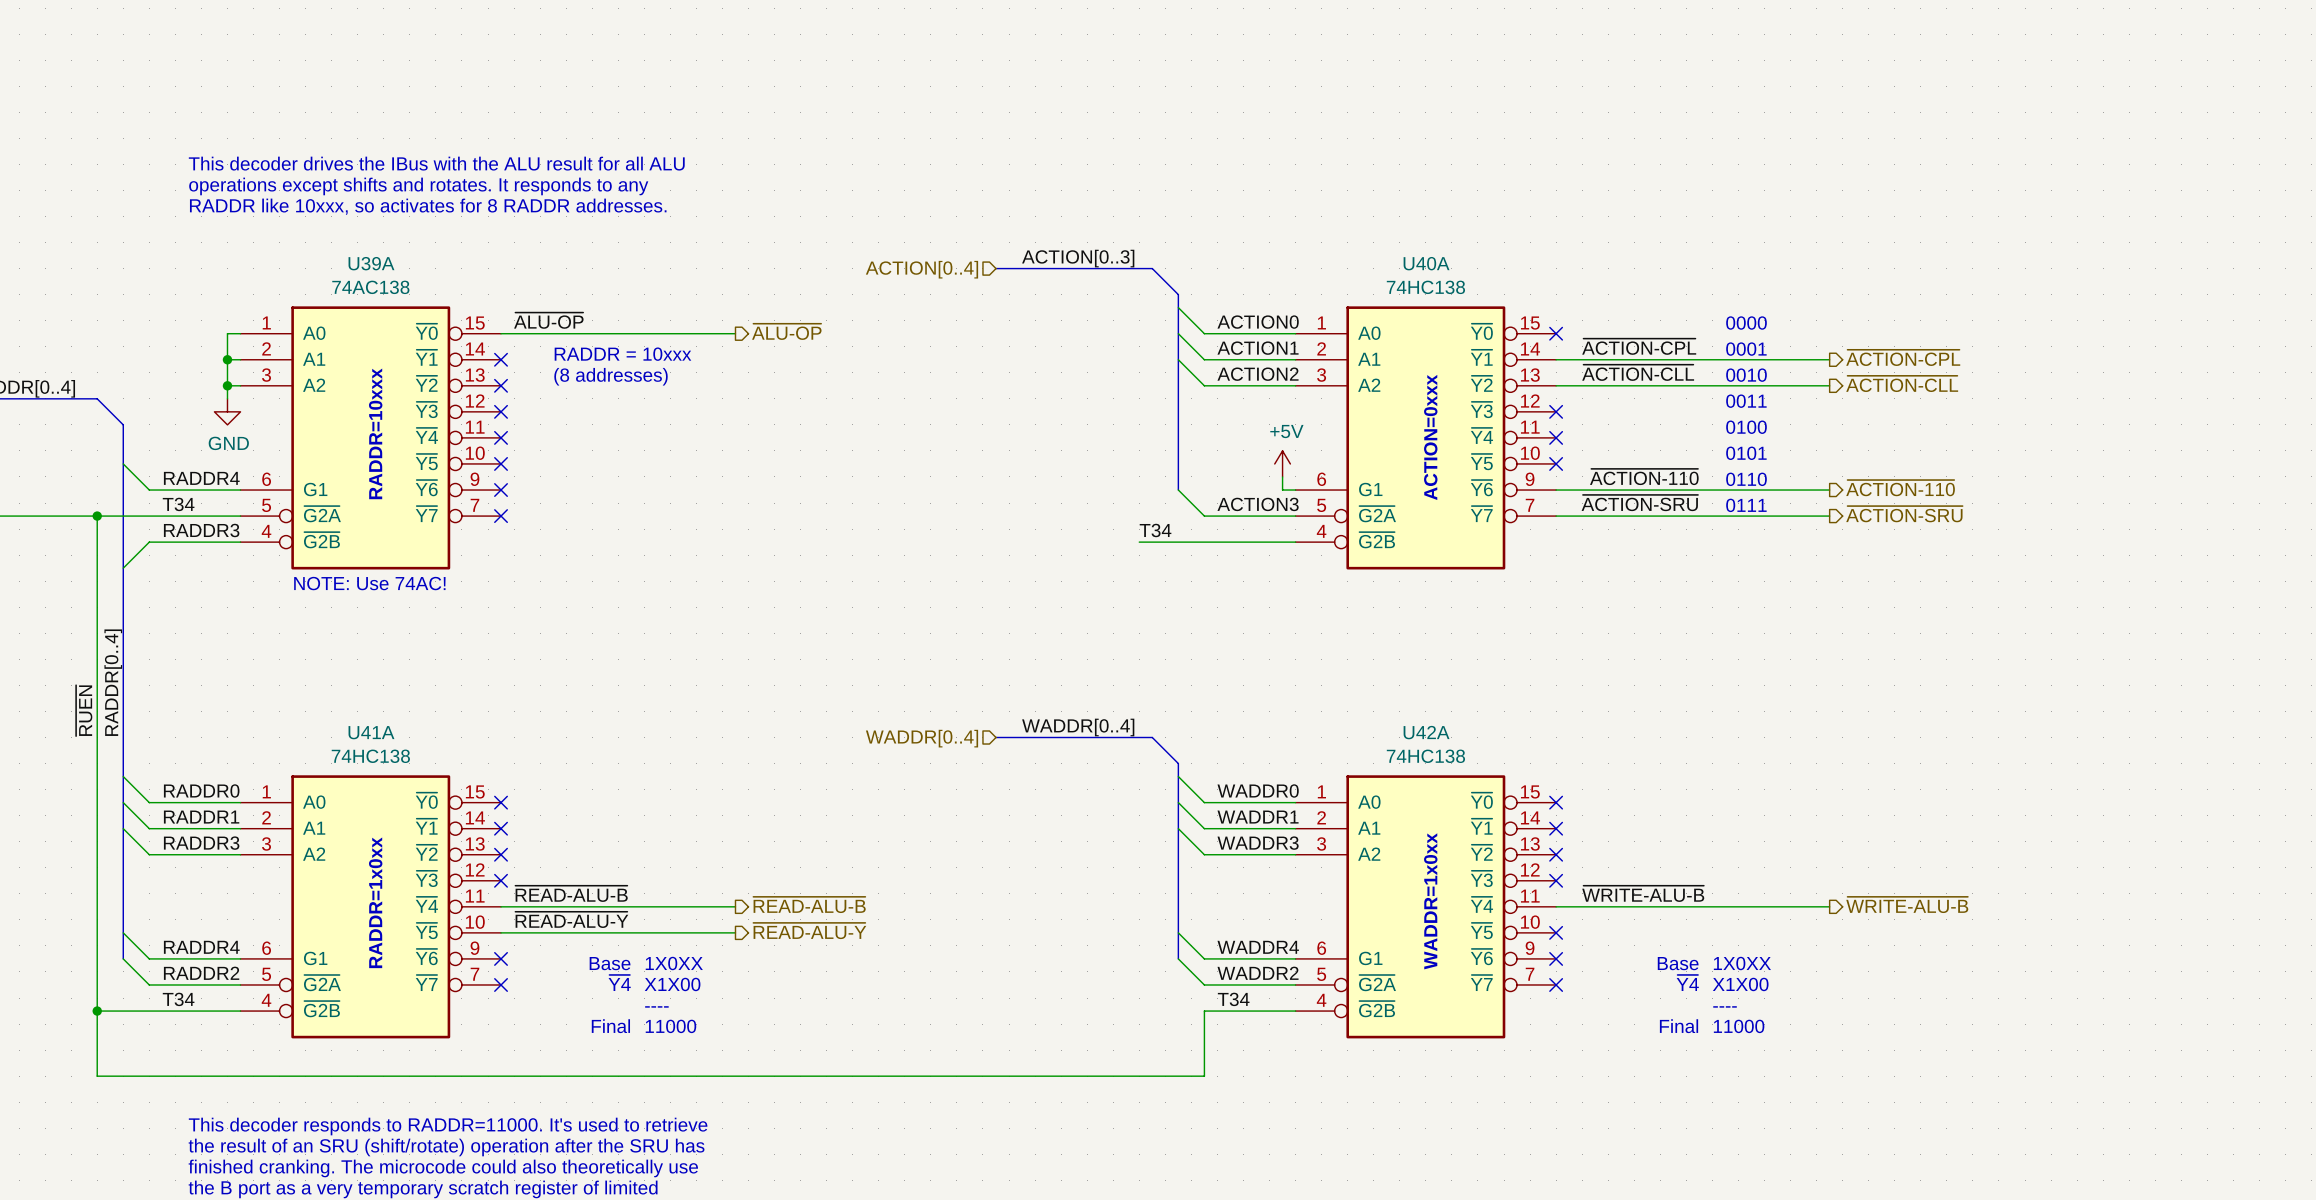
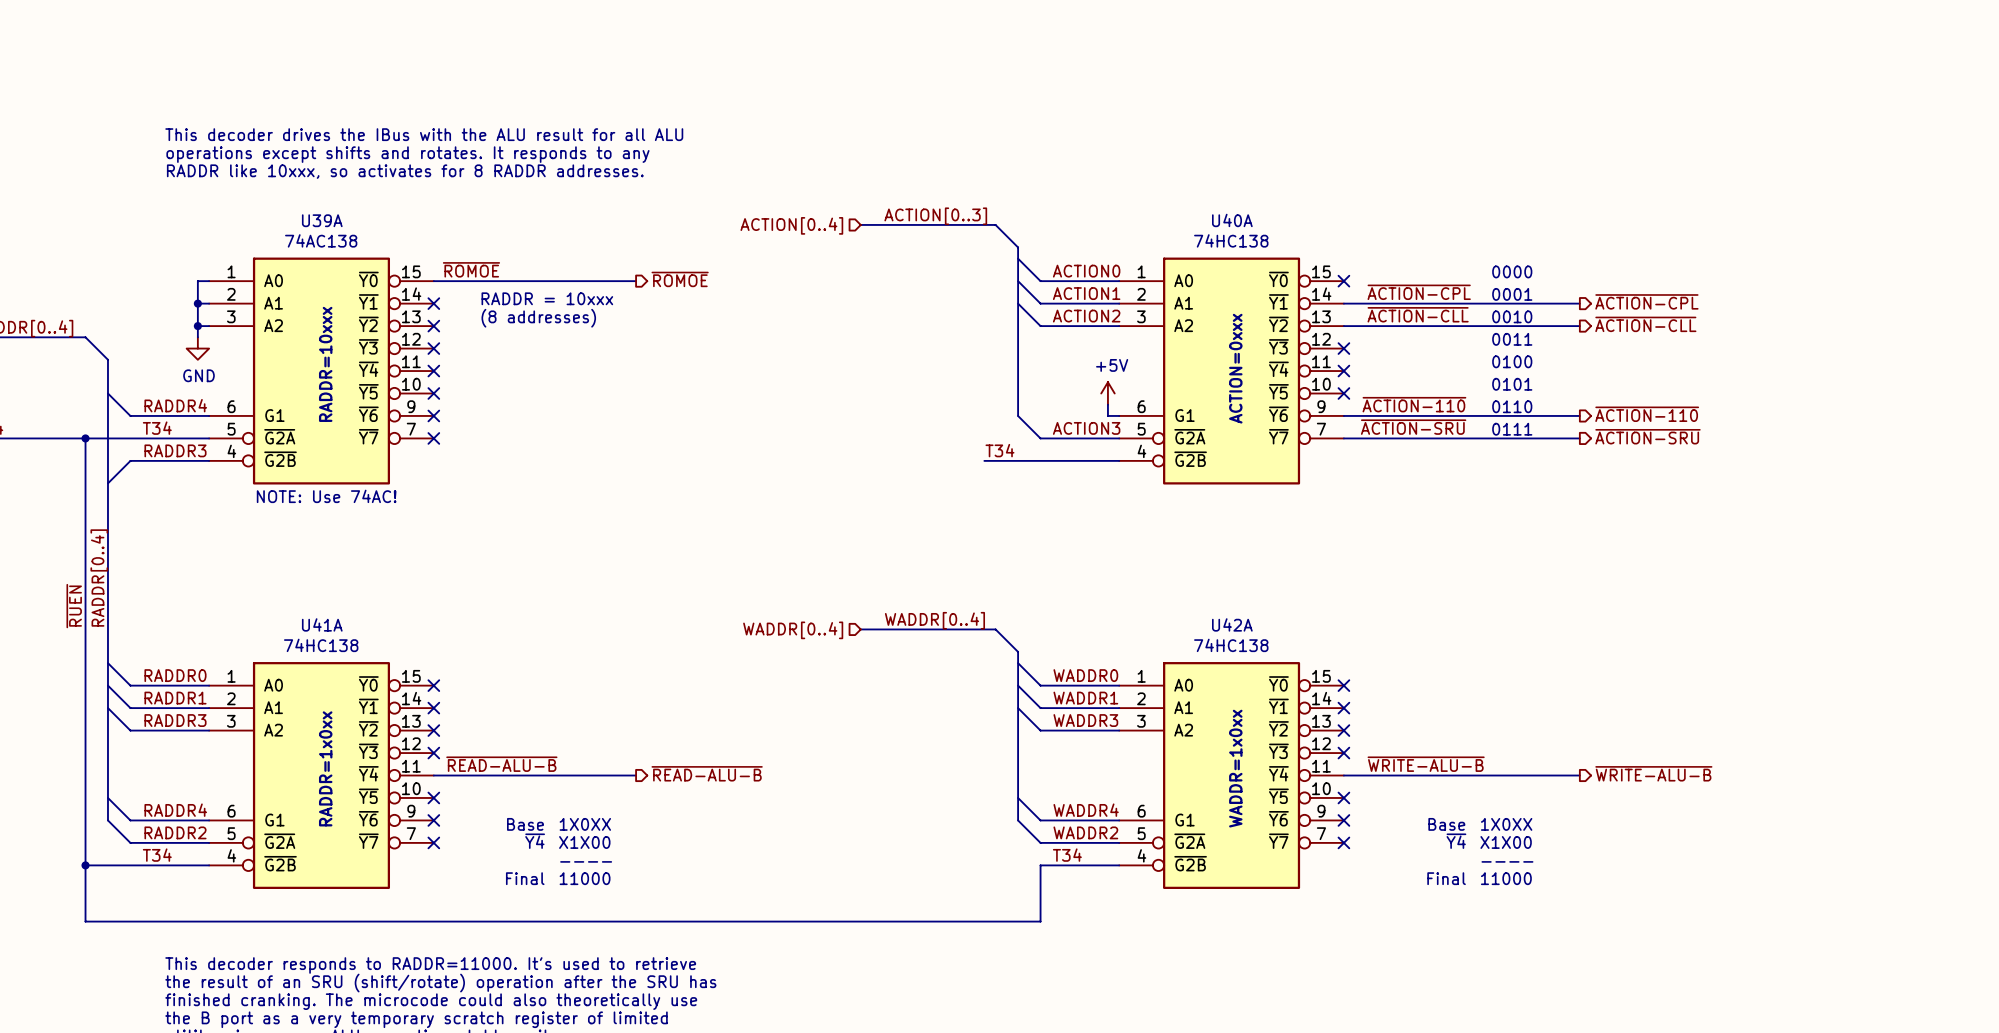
label: none -> ~{ROMOE} (471, 269)
label: ~{ALU-OP} (548, 320) -> none
hierarchical label: ~{ALU-OP} (786, 331) -> ~{ROMOE} (680, 279)
label: ~{READ-ALU-Y} (571, 919) -> none
hierarchical label: ~{READ-ALU-Y} (809, 930) -> none
wire: (501, 932) (735, 932) -> none
no-connect mark: none -> (433, 797)

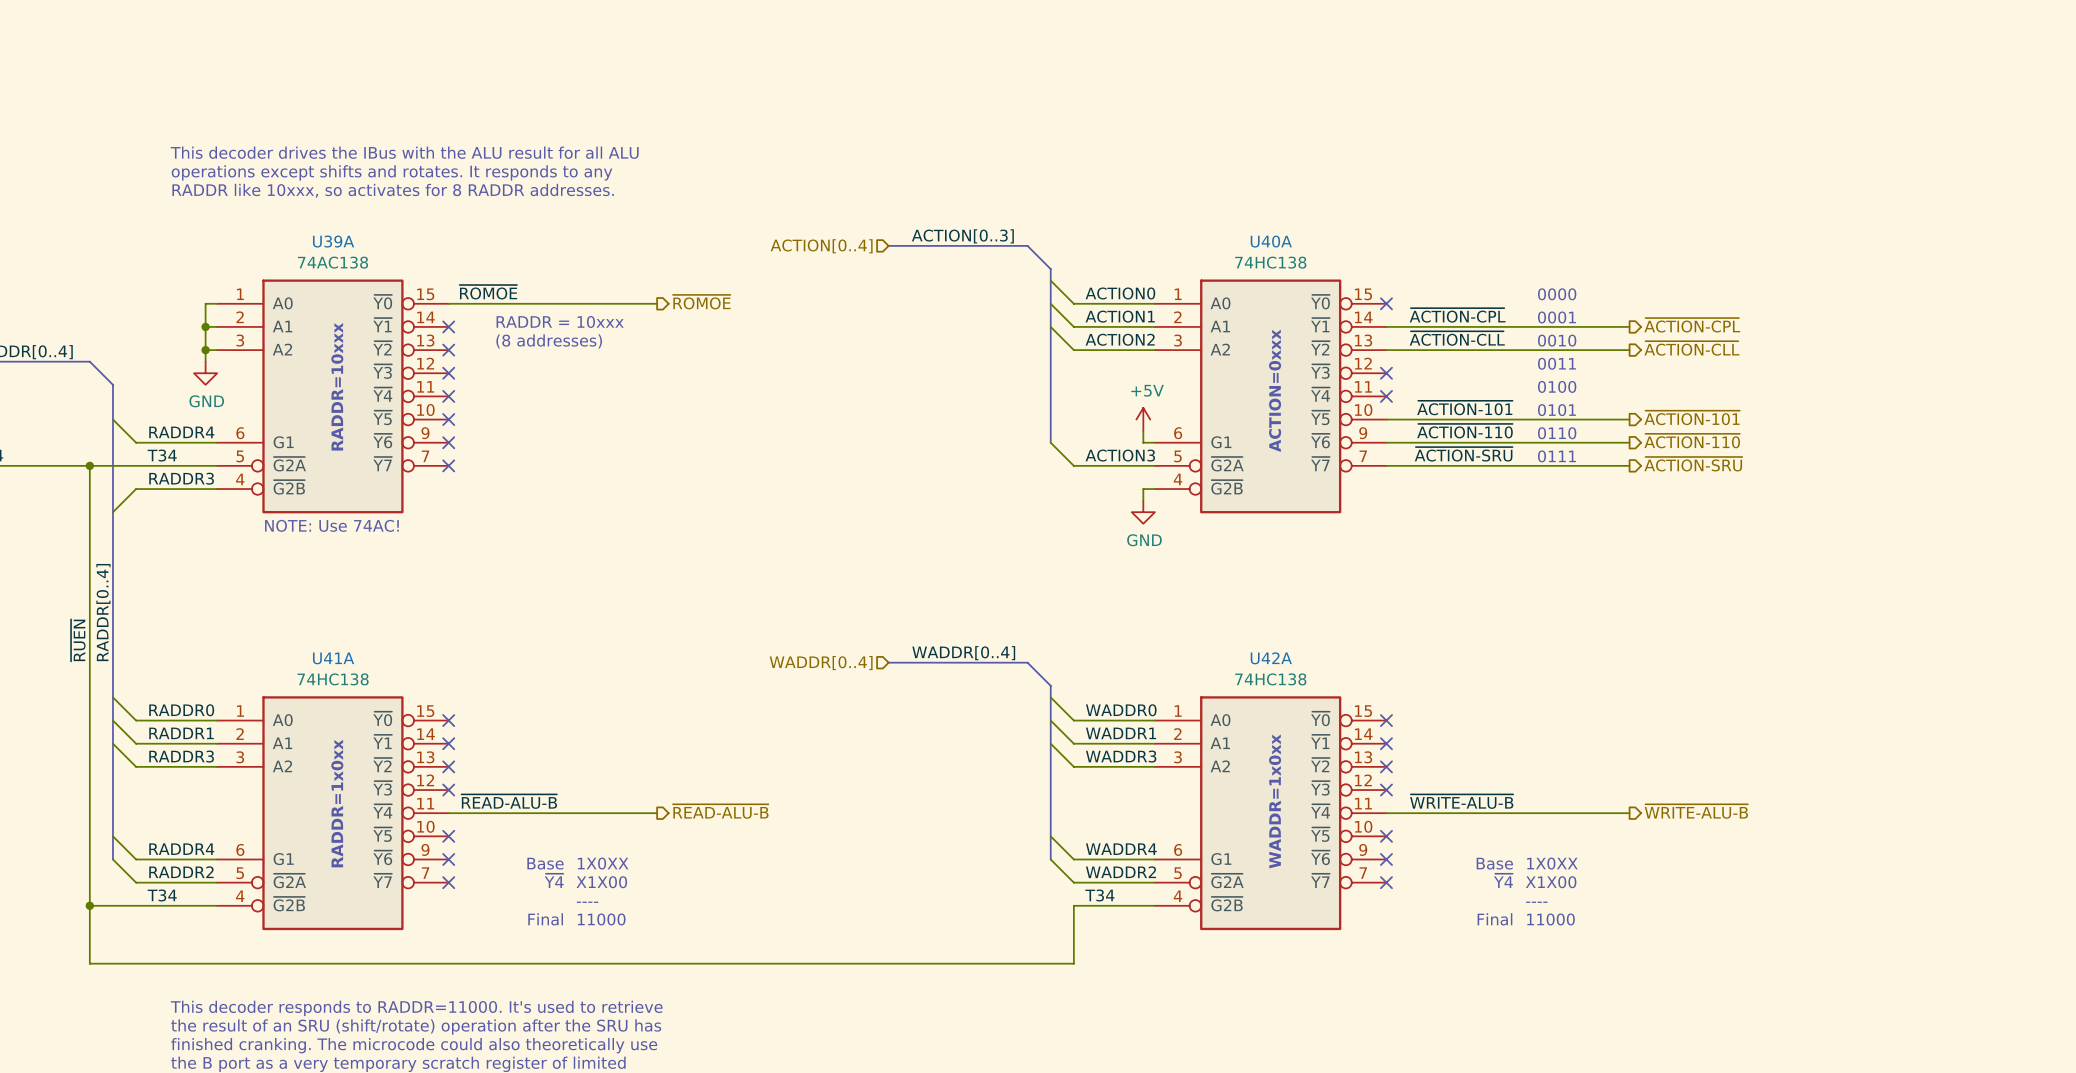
label: none -> ~{ACTION-101} (1464, 408)
hierarchical label: none -> ~{ACTION-101} (1692, 417)
wire: none -> (1386, 419) (1629, 419)
no-connect mark: (1343, 393) -> none
label: T34 (999, 450) -> none
wire: (984, 460) (1107, 460) -> (1143, 500) (1143, 489)
power symbol: none -> GND (1143, 512)

